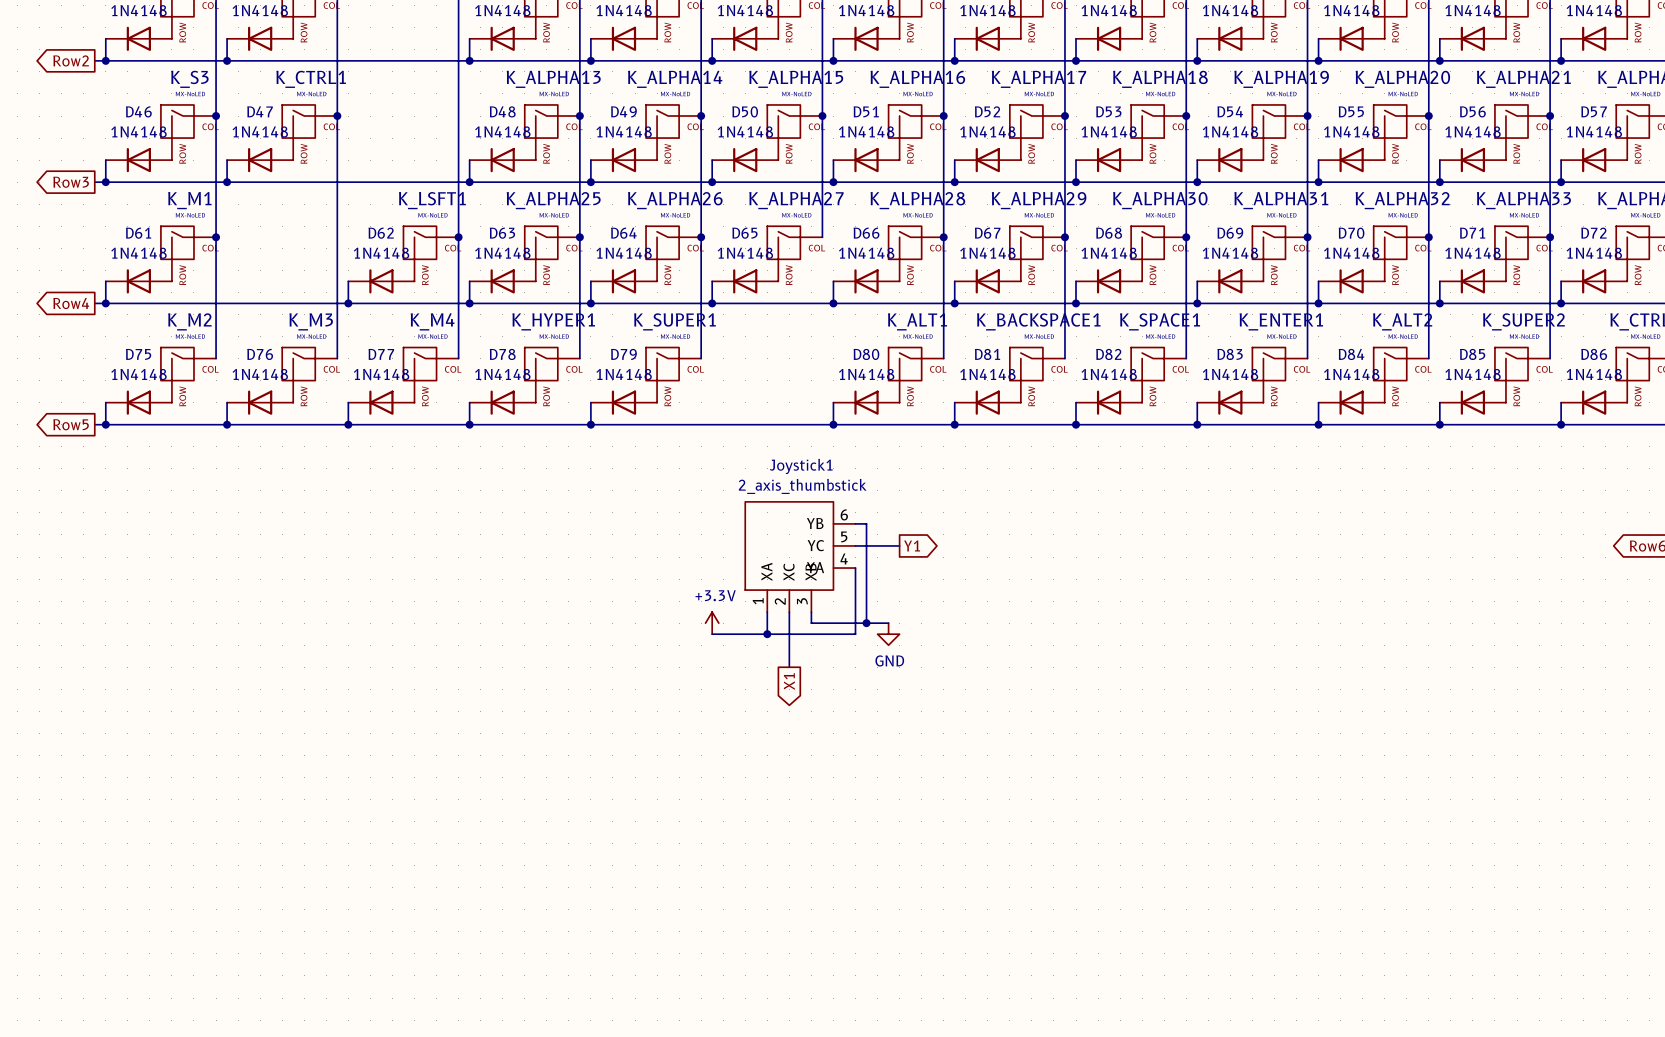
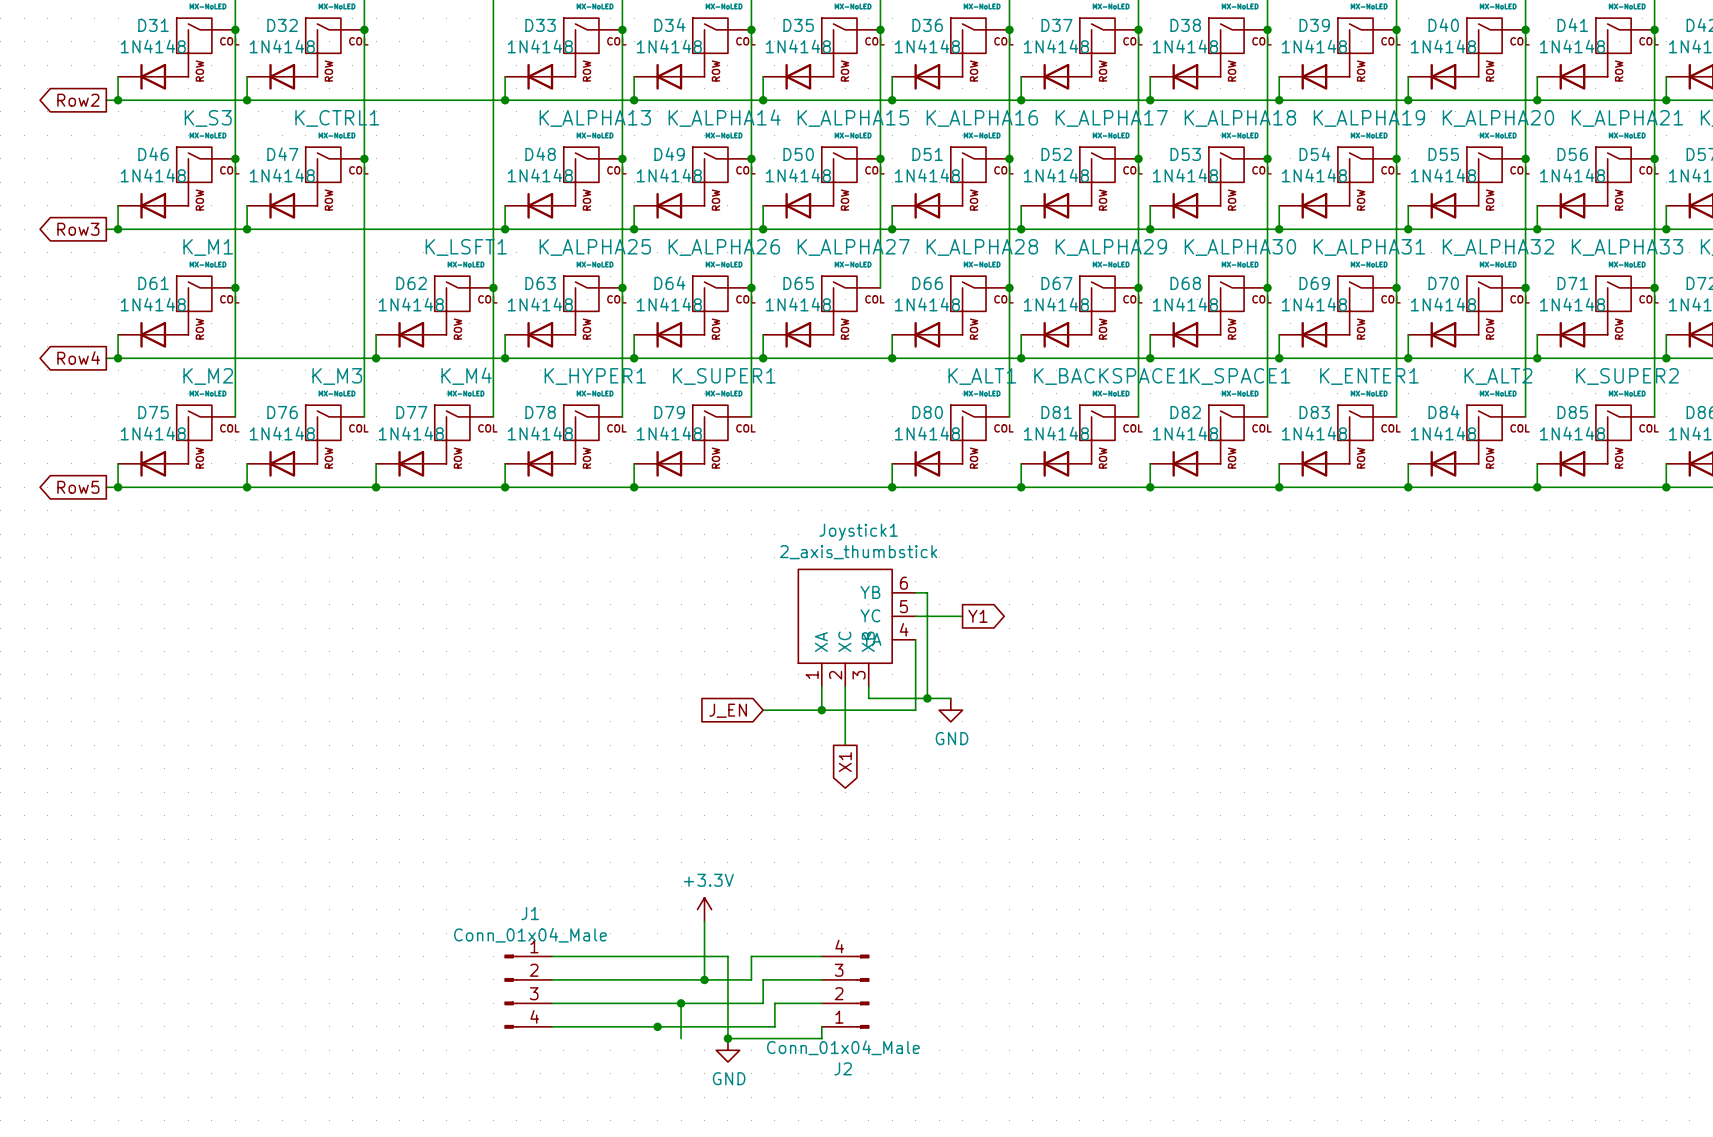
power symbol position: +3.3V (712, 623) -> +3.3V (704, 909)
global label: none -> J_EN (728, 710)
wire: none -> (704, 921) (704, 979)
wire: none -> (552, 956) (727, 956) (727, 1038) (821, 1038) (821, 1026)
wire: none -> (821, 956) (751, 956) (751, 979) (552, 979)
junction: none -> (704, 979)
wire: none -> (821, 979) (763, 979) (763, 1003) (552, 1003)
J1: none -> Conn_01x04_Male (528, 991)
J2: none -> Conn_01x04_Male (845, 991)
wire: none -> (681, 1003) (681, 1038)
junction: none -> (681, 1003)
wire: none -> (821, 1003) (774, 1003) (774, 1026) (552, 1026)
junction: none -> (657, 1026)
junction: none -> (727, 1038)
power symbol: none -> GND (727, 1050)

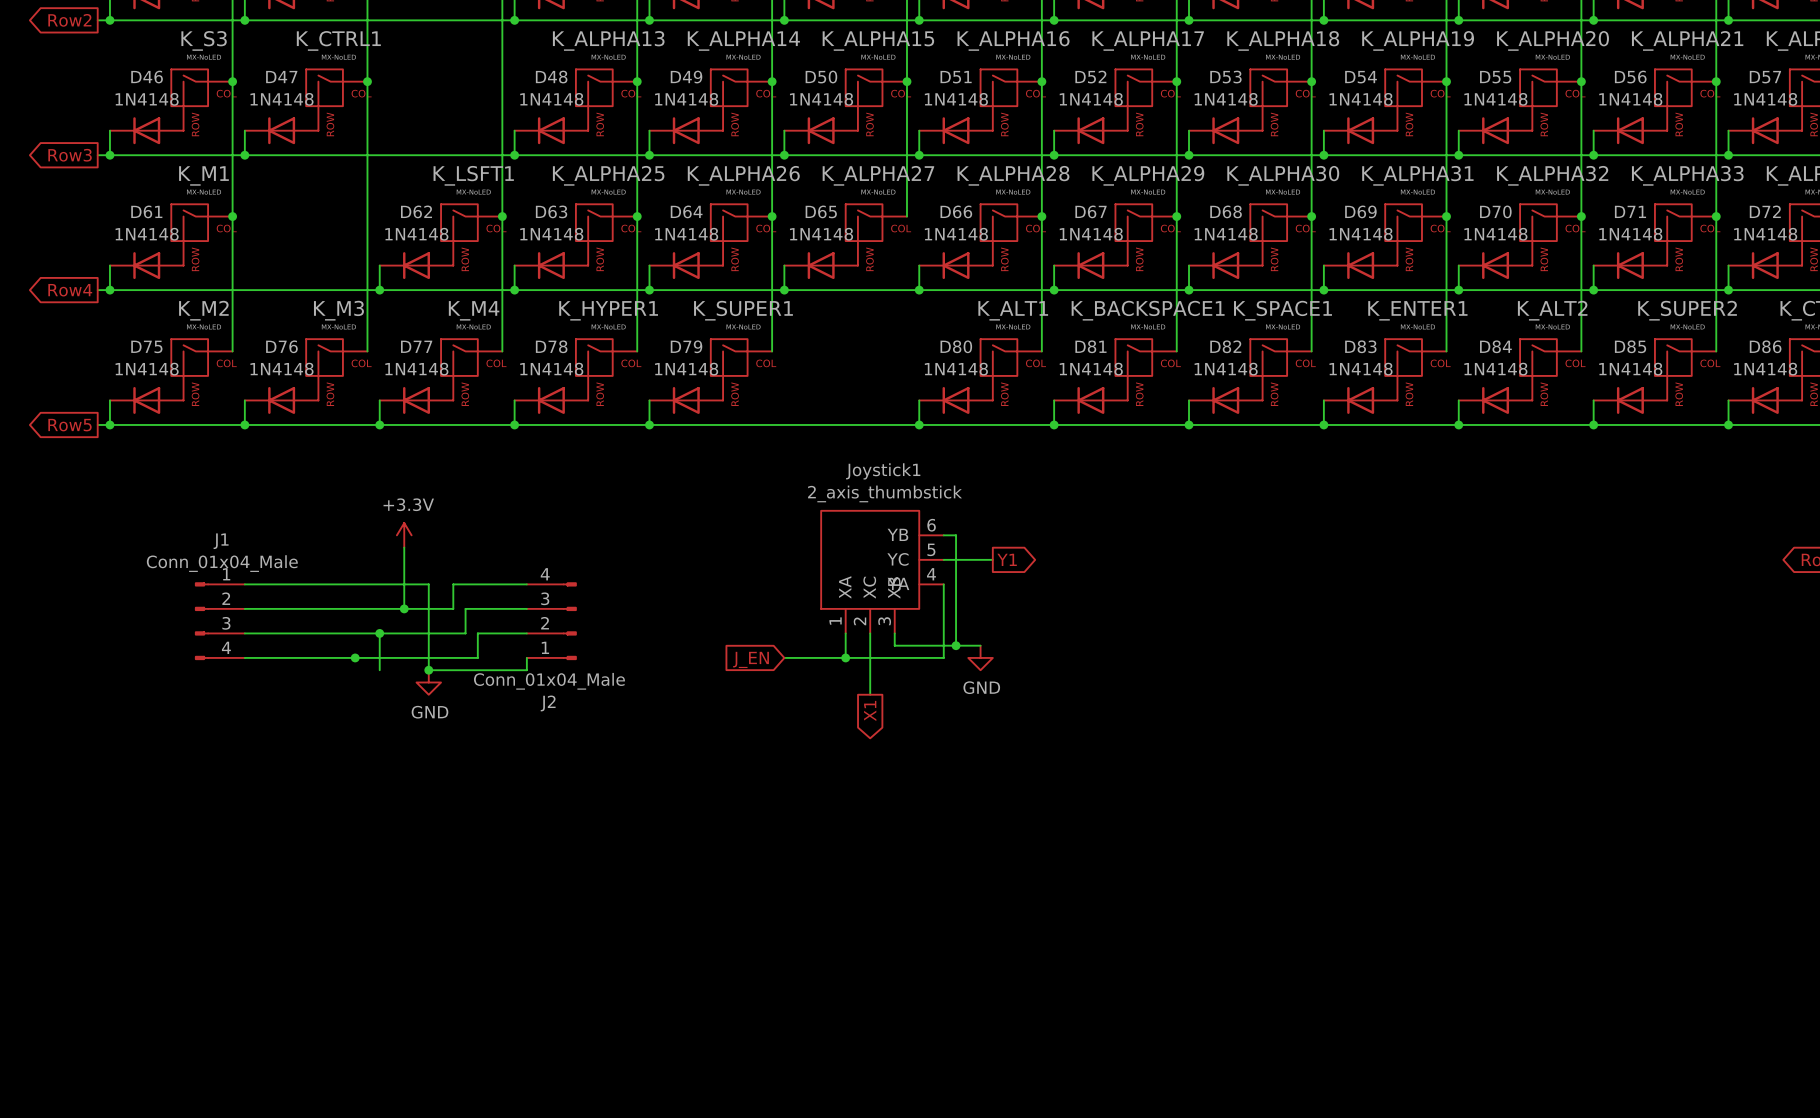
power symbol: none -> +3.3V (404, 535)
wire: none -> (404, 547) (404, 608)
wire: none -> (244, 584) (428, 584) (428, 670) (526, 670) (526, 657)
wire: none -> (526, 584) (453, 584) (453, 608) (244, 608)
junction: none -> (404, 608)
wire: none -> (526, 608) (465, 608) (465, 633) (244, 633)
wire: none -> (379, 633) (379, 670)
junction: none -> (379, 633)
wire: none -> (526, 633) (477, 633) (477, 657) (244, 657)
junction: none -> (355, 657)
junction: none -> (428, 670)
power symbol: none -> GND (428, 682)
power symbol: +3.3V (704, 909) -> none
wire: (704, 921) (704, 979) -> none
wire: (552, 956) (727, 956) (727, 1038) (821, 1038) (821, 1026) -> none
wire: (821, 956) (751, 956) (751, 979) (552, 979) -> none
junction: (704, 979) -> none
wire: (821, 979) (763, 979) (763, 1003) (552, 1003) -> none
J1 position: (528, 991) -> (219, 621)
J2 position: (845, 991) -> (551, 621)
wire: (681, 1003) (681, 1038) -> none
junction: (681, 1003) -> none
wire: (821, 1003) (774, 1003) (774, 1026) (552, 1026) -> none
junction: (657, 1026) -> none
junction: (727, 1038) -> none
power symbol: GND (727, 1050) -> none

